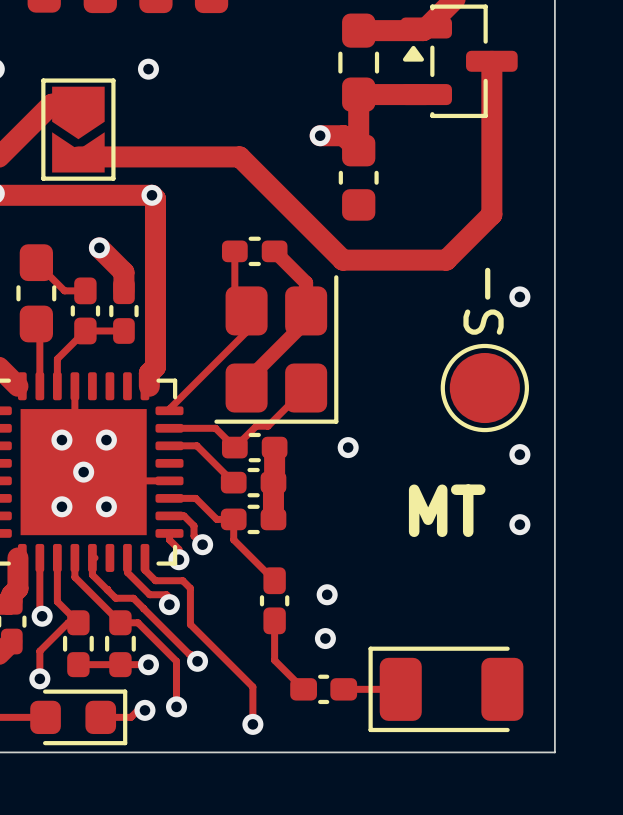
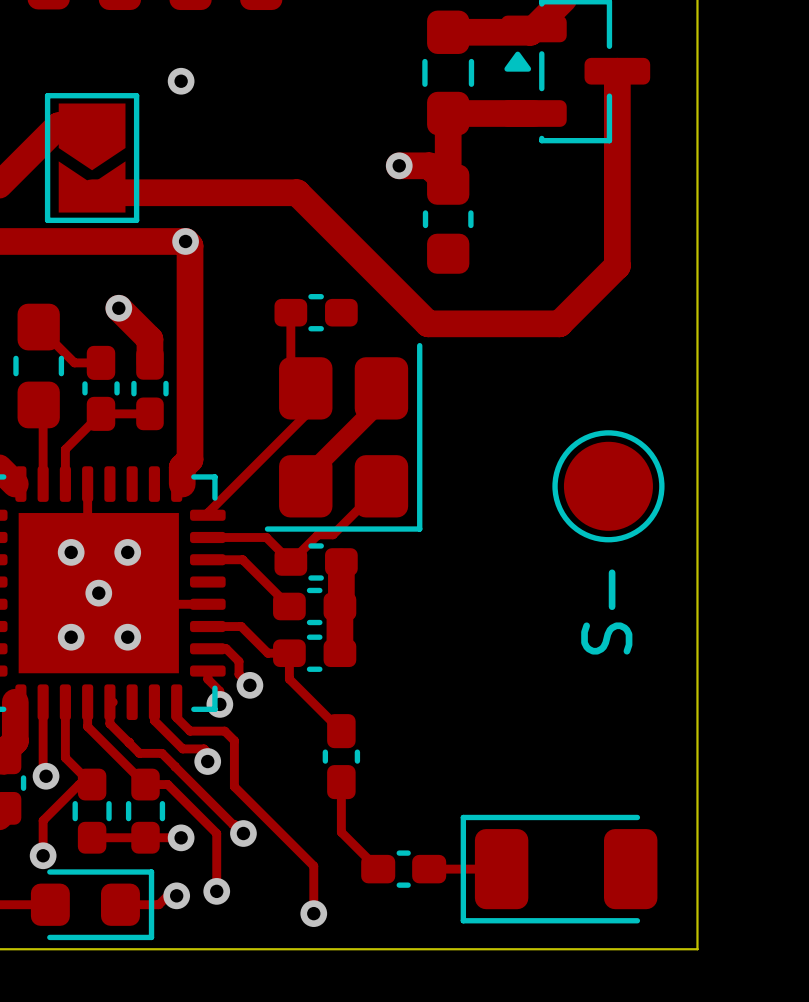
track: (274, 251) (306, 282) (306, 310) -> none
via: (519, 296) -> none
part value position: S- (483, 301) -> S- (606, 612)
via: (348, 447) -> none
via: (519, 454) -> none
text: MT (447, 510) -> none
via: (519, 524) -> none
via: (327, 594) -> none
via: (325, 638) -> none

